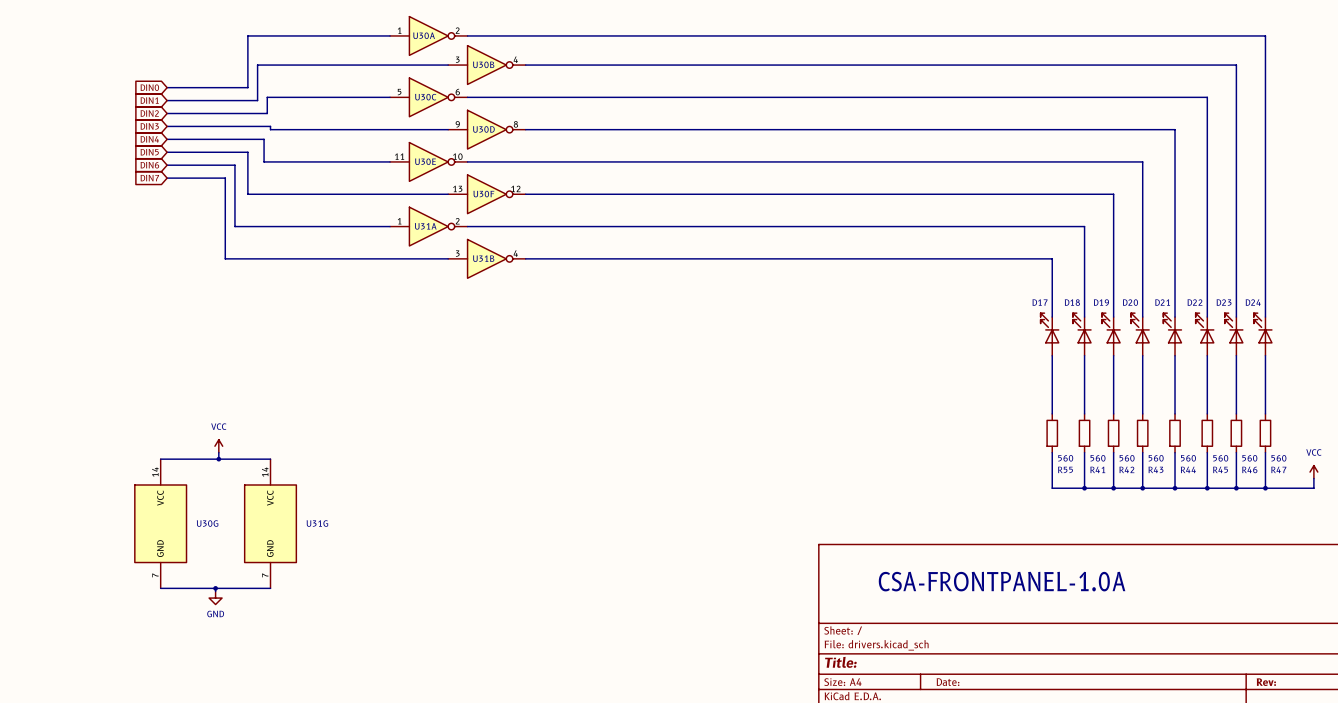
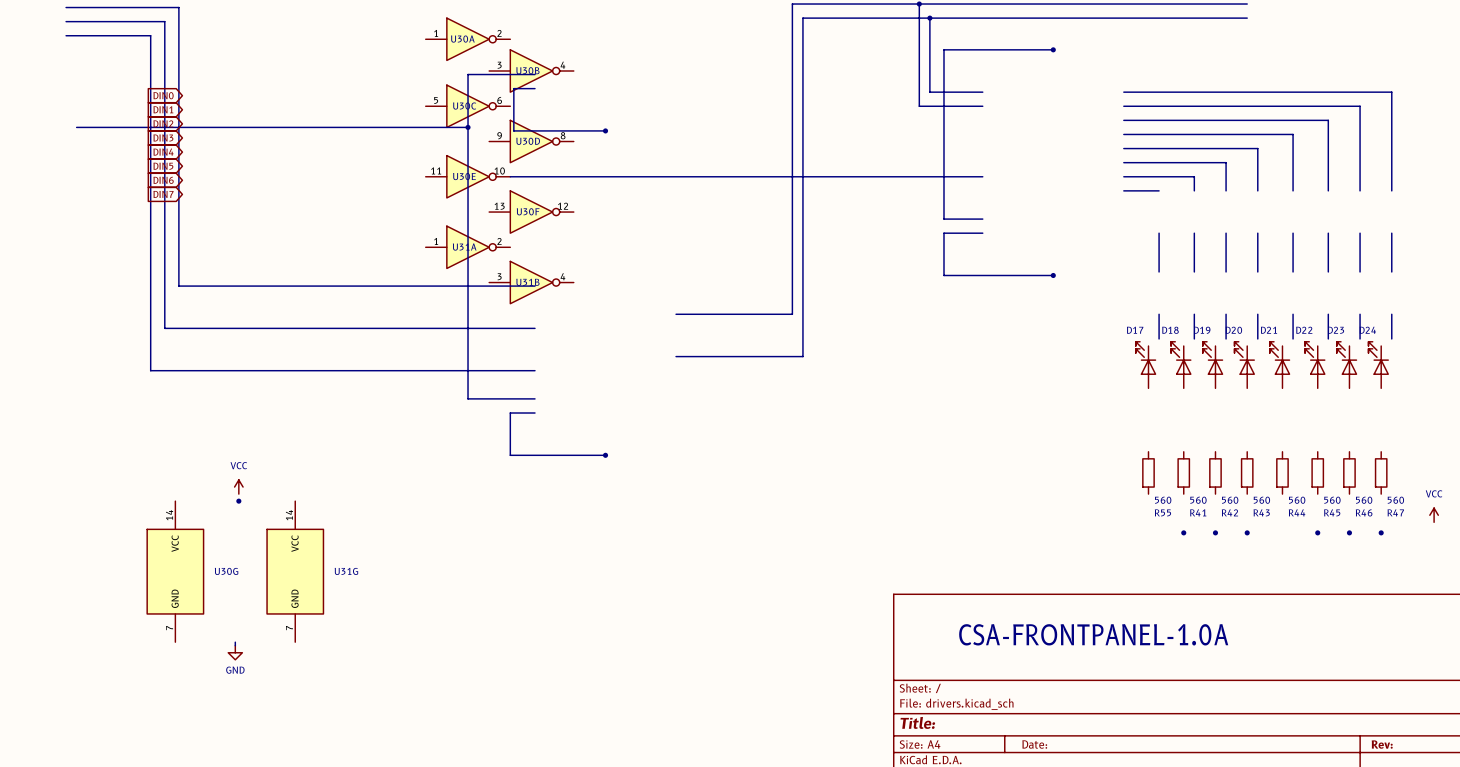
junction: none -> (919, 4)
wire: none -> (1247, 4) (792, 4) (792, 314) (676, 314)
wire: none -> (66, 7) (178, 7) (178, 286) (535, 286)
wire: none -> (929, 18) (929, 92) (982, 92)
junction: none -> (929, 18)
wire: none -> (1247, 18) (802, 18) (802, 356) (676, 356)
wire: none -> (66, 21) (164, 21) (164, 328) (535, 328)
wire: none -> (66, 35) (150, 35) (150, 370) (535, 370)
wire: (390, 35) (247, 35) (247, 87) (167, 87) -> none
wire: (467, 35) (1265, 35) (1265, 317) -> none
wire: none -> (1053, 49) (943, 49) (943, 219) (982, 219)
junction: none -> (1053, 49)
wire: (448, 65) (257, 65) (257, 100) (167, 100) -> none
wire: (525, 65) (1236, 65) (1236, 317) -> none
wire: none -> (535, 74) (468, 74) (468, 398) (535, 398)
wire: none -> (535, 88) (513, 88) (513, 130) (605, 130)
wire: none -> (1123, 92) (1391, 92) (1391, 190)
wire: (390, 97) (267, 97) (267, 113) (167, 113) -> none
wire: (467, 97) (842, 97) -> (919, 4) (919, 106)
wire: (900, 97) (1029, 97) -> none
wire: (1207, 97) (1207, 317) -> (1317, 106) (1360, 106) (1360, 190)
wire: none -> (1123, 120) (1328, 120) (1328, 190)
wire: none -> (76, 127) (468, 127)
junction: none -> (468, 127)
junction: none -> (605, 130)
wire: none -> (1123, 134) (1293, 134) (1293, 190)
wire: (167, 126) (270, 126) (270, 129) (448, 129) -> none
wire: (525, 129) (1175, 129) (1175, 317) -> none
wire: none -> (1123, 148) (1257, 148) (1257, 190)
wire: (167, 139) (264, 139) (264, 161) (390, 161) -> none
wire: none -> (1123, 162) (1226, 162) (1226, 190)
wire: (167, 152) (247, 152) (247, 194) (448, 194) -> none
wire: (900, 161) (1029, 161) -> none
wire: (1094, 161) (1142, 161) (1142, 317) -> (1194, 176) (1194, 190)
wire: (167, 165) (234, 165) (234, 226) (390, 226) -> none
wire: none -> (1123, 190) (1159, 190)
wire: (167, 178) (225, 178) (225, 258) (448, 258) -> none
wire: (525, 194) (1113, 194) (1113, 317) -> none
wire: none -> (982, 233) (943, 233) (943, 275) (1053, 275)
wire: none -> (1159, 233) (1159, 271)
wire: none -> (1194, 233) (1194, 271)
wire: none -> (1226, 233) (1226, 271)
wire: none -> (1257, 233) (1257, 271)
wire: none -> (1293, 233) (1293, 271)
wire: none -> (1328, 233) (1328, 271)
wire: none -> (1360, 233) (1360, 271)
wire: none -> (1391, 233) (1391, 271)
wire: (467, 226) (1084, 226) (1084, 317) -> none
junction: none -> (1053, 275)
wire: (525, 258) (1052, 258) (1052, 317) -> none
wire: none -> (1159, 314) (1159, 338)
wire: none -> (1194, 314) (1194, 338)
wire: none -> (1226, 314) (1226, 338)
wire: none -> (1257, 314) (1257, 338)
wire: none -> (1293, 314) (1293, 338)
wire: none -> (1328, 314) (1328, 338)
wire: none -> (1360, 314) (1360, 338)
wire: none -> (1391, 314) (1391, 338)
wire: (1052, 355) (1052, 413) -> none
wire: (1084, 355) (1084, 413) -> none
wire: (1113, 355) (1113, 413) -> none
wire: (1142, 355) (1142, 413) -> none
wire: (1175, 355) (1175, 413) -> none
wire: (1207, 355) (1207, 413) -> none
wire: (1236, 355) (1236, 413) -> none
wire: (1265, 355) (1265, 413) -> none
wire: none -> (535, 413) (510, 413) (510, 455) (605, 455)
junction: none -> (605, 455)
wire: (218, 452) (218, 459) -> none
wire: (1052, 452) (1052, 488) (1313, 488) (1313, 478) -> none
wire: (1084, 452) (1084, 488) -> none
wire: (1113, 452) (1113, 488) -> none
wire: (1142, 452) (1142, 488) -> none
wire: (1175, 452) (1175, 488) -> none
wire: (1207, 452) (1207, 488) -> none
wire: (1236, 452) (1236, 488) -> none
wire: (1265, 452) (1265, 488) -> none
wire: (160, 459) (270, 459) -> none
junction: (1175, 488) -> none
wire: (160, 588) (270, 588) -> none
junction: (215, 588) -> none

